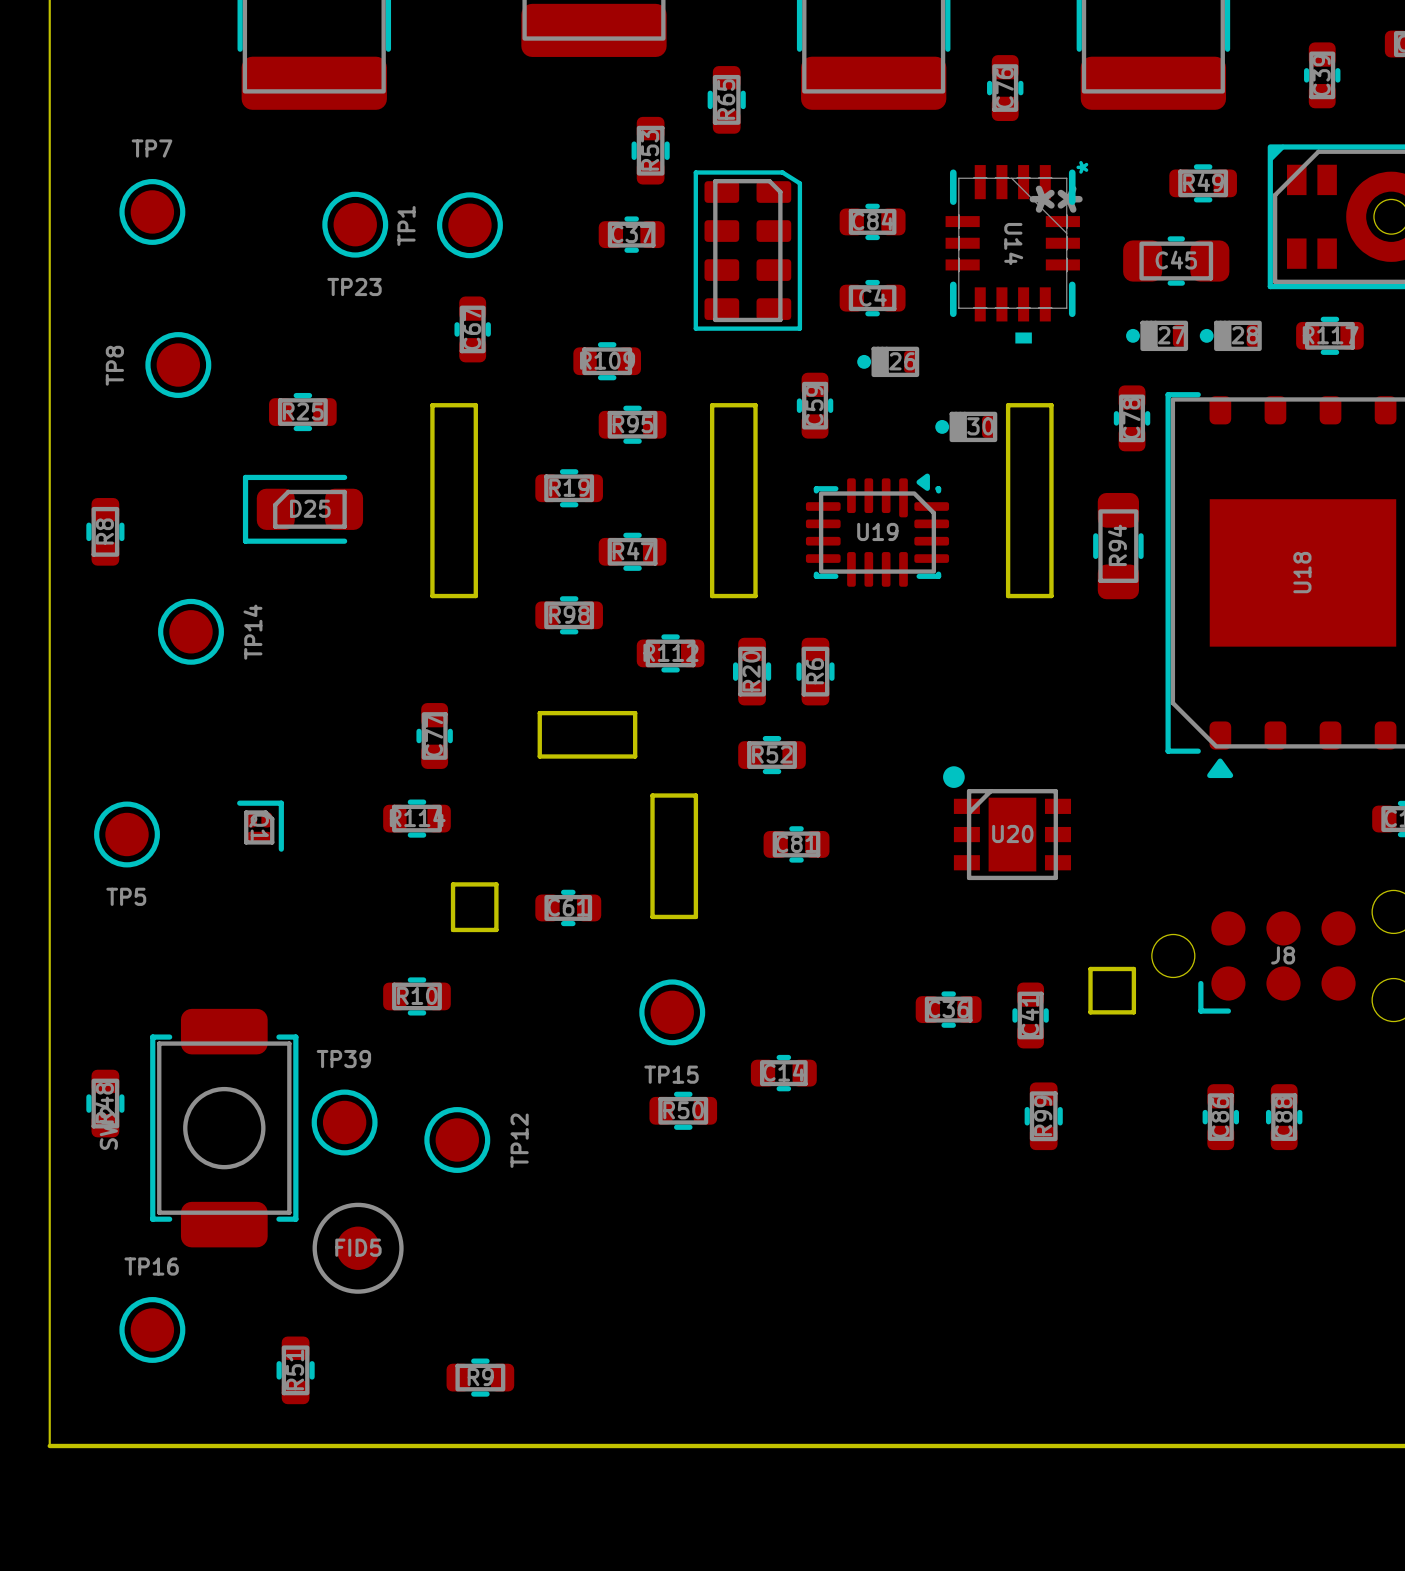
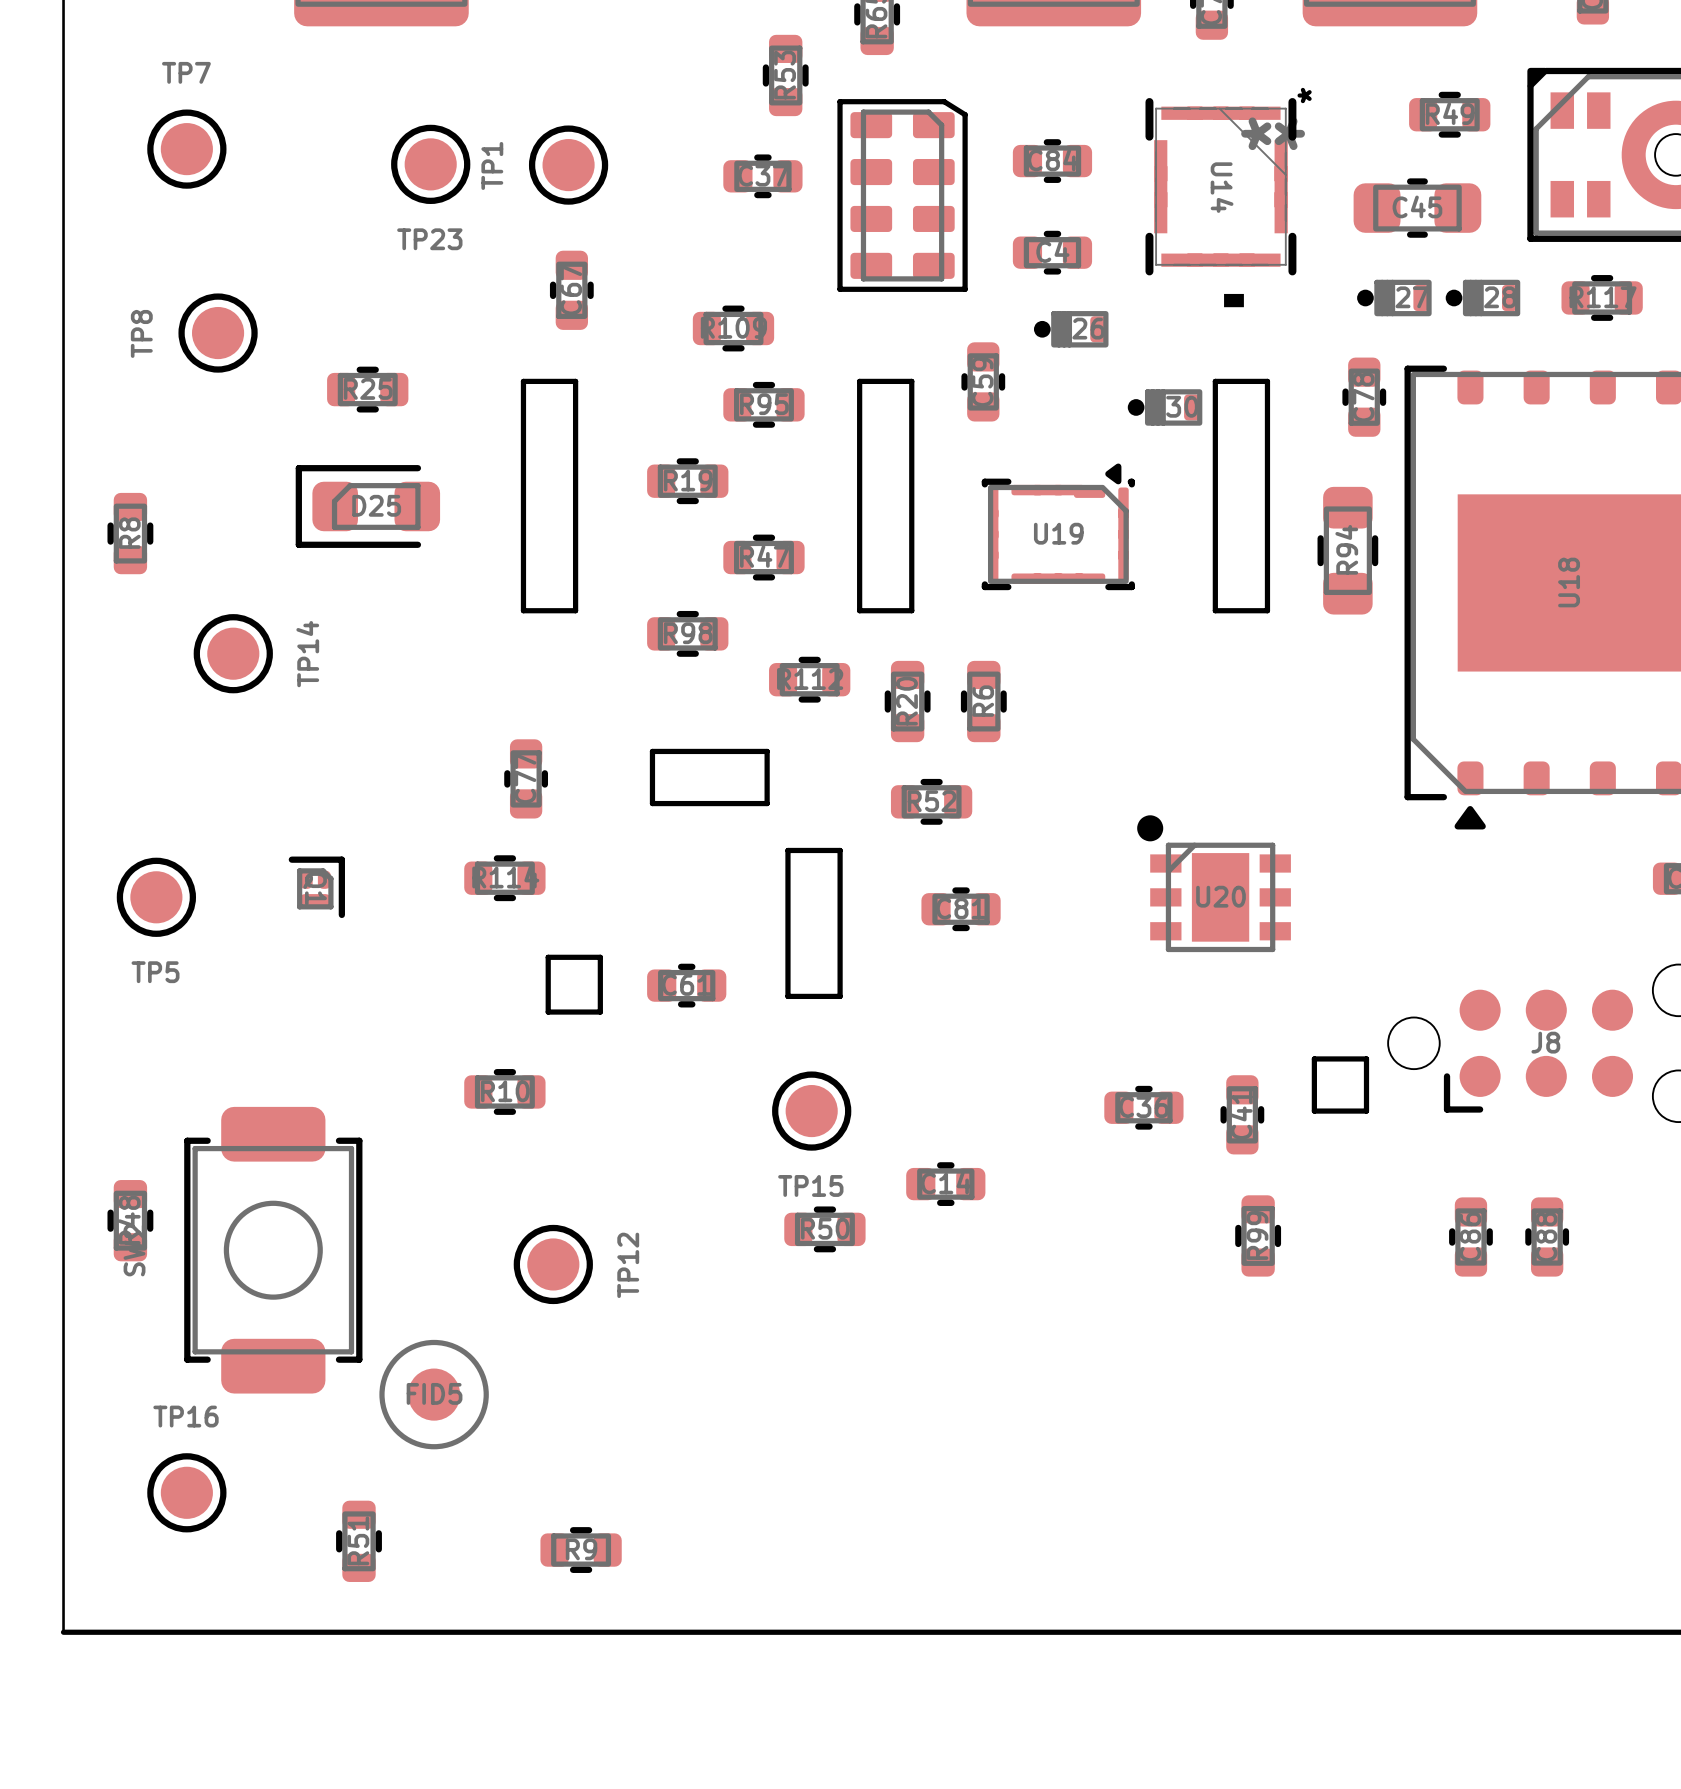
U14 footprint: [945, 165, 1080, 344] -> [1145, 98, 1297, 308]
U19 footprint: [805, 473, 950, 587] -> [981, 463, 1135, 591]
TP39: (344, 1122) -> none

